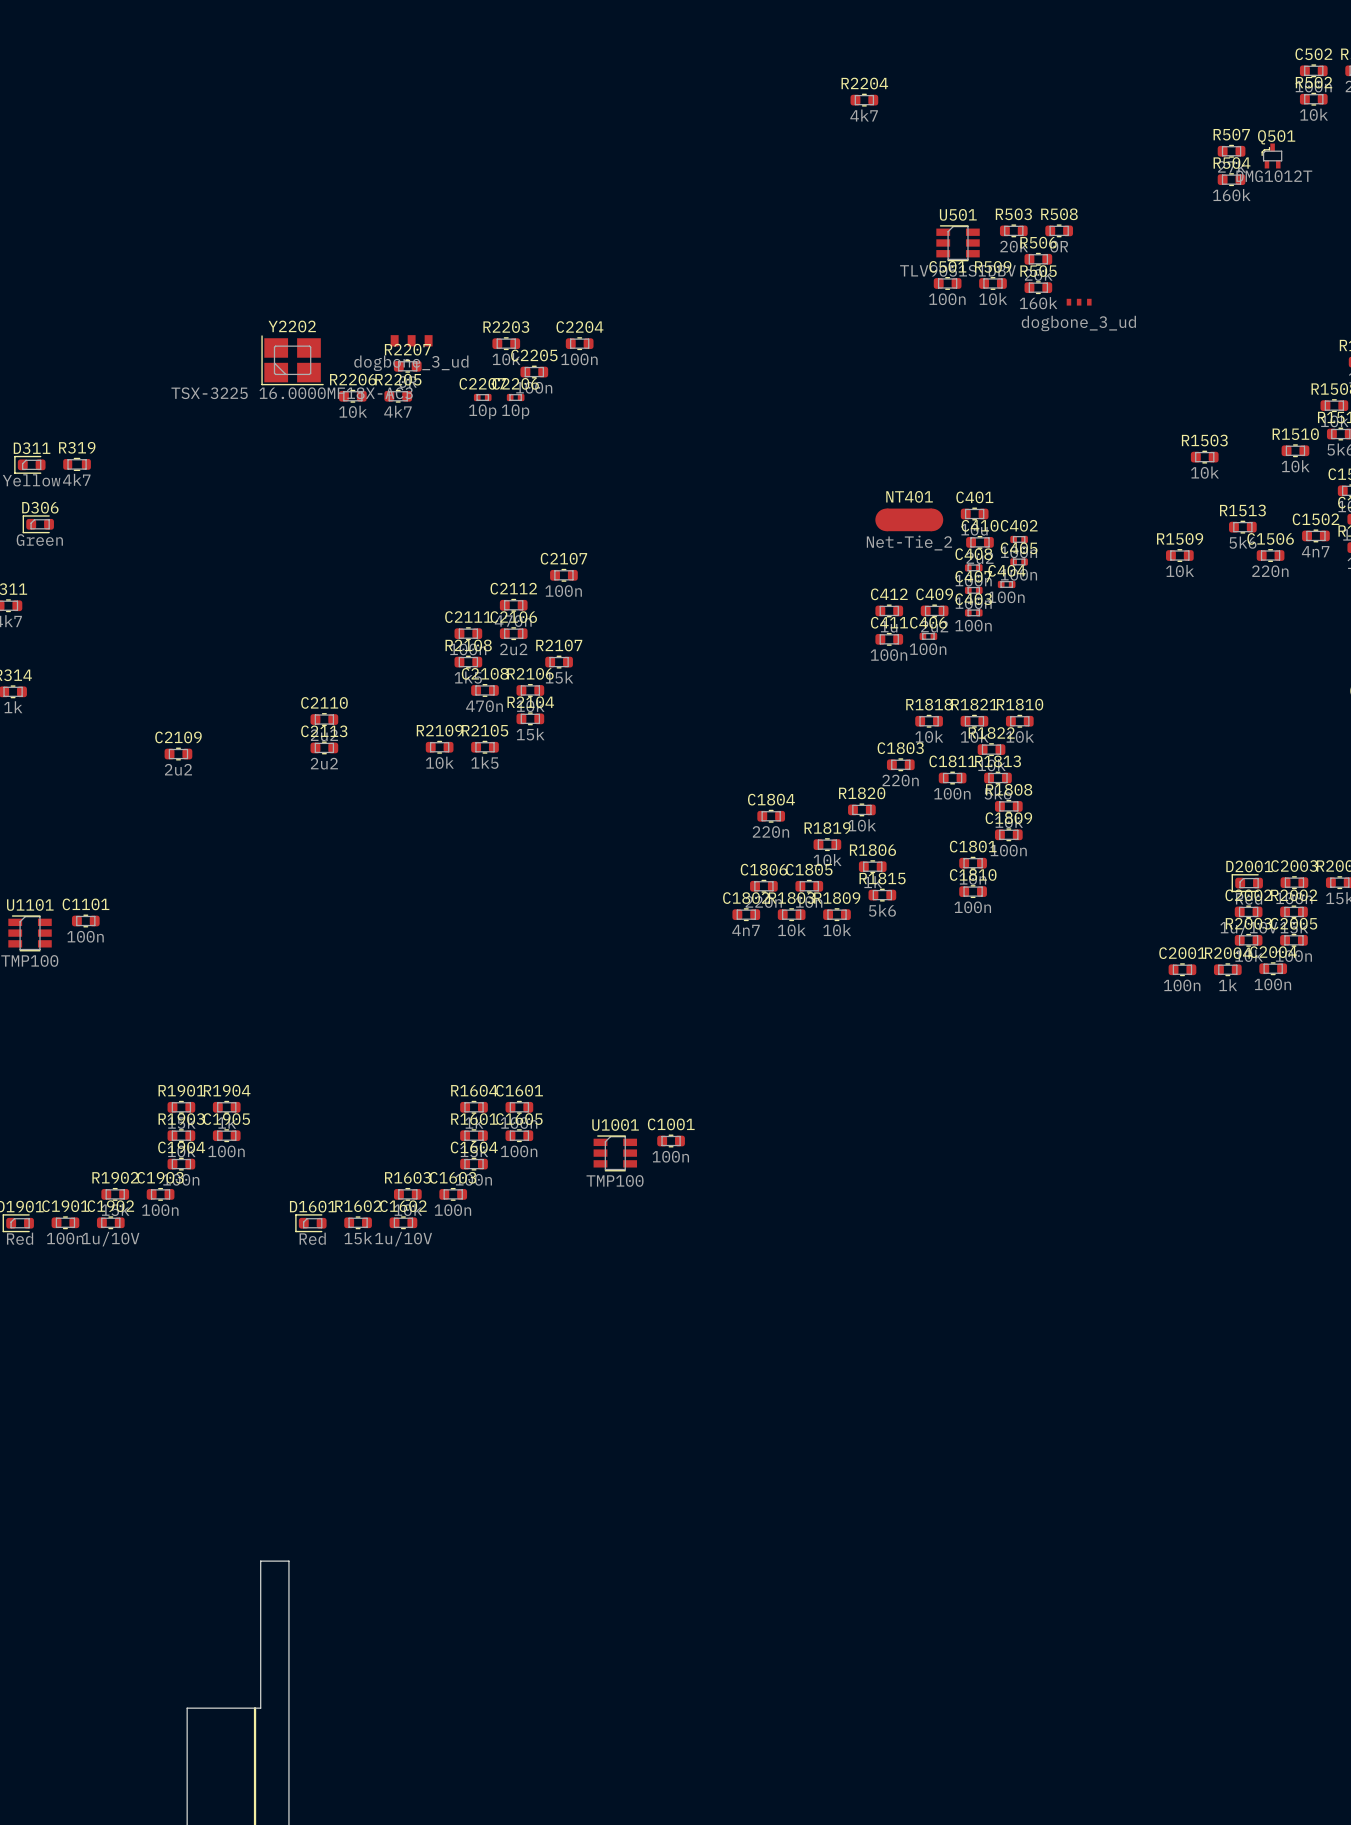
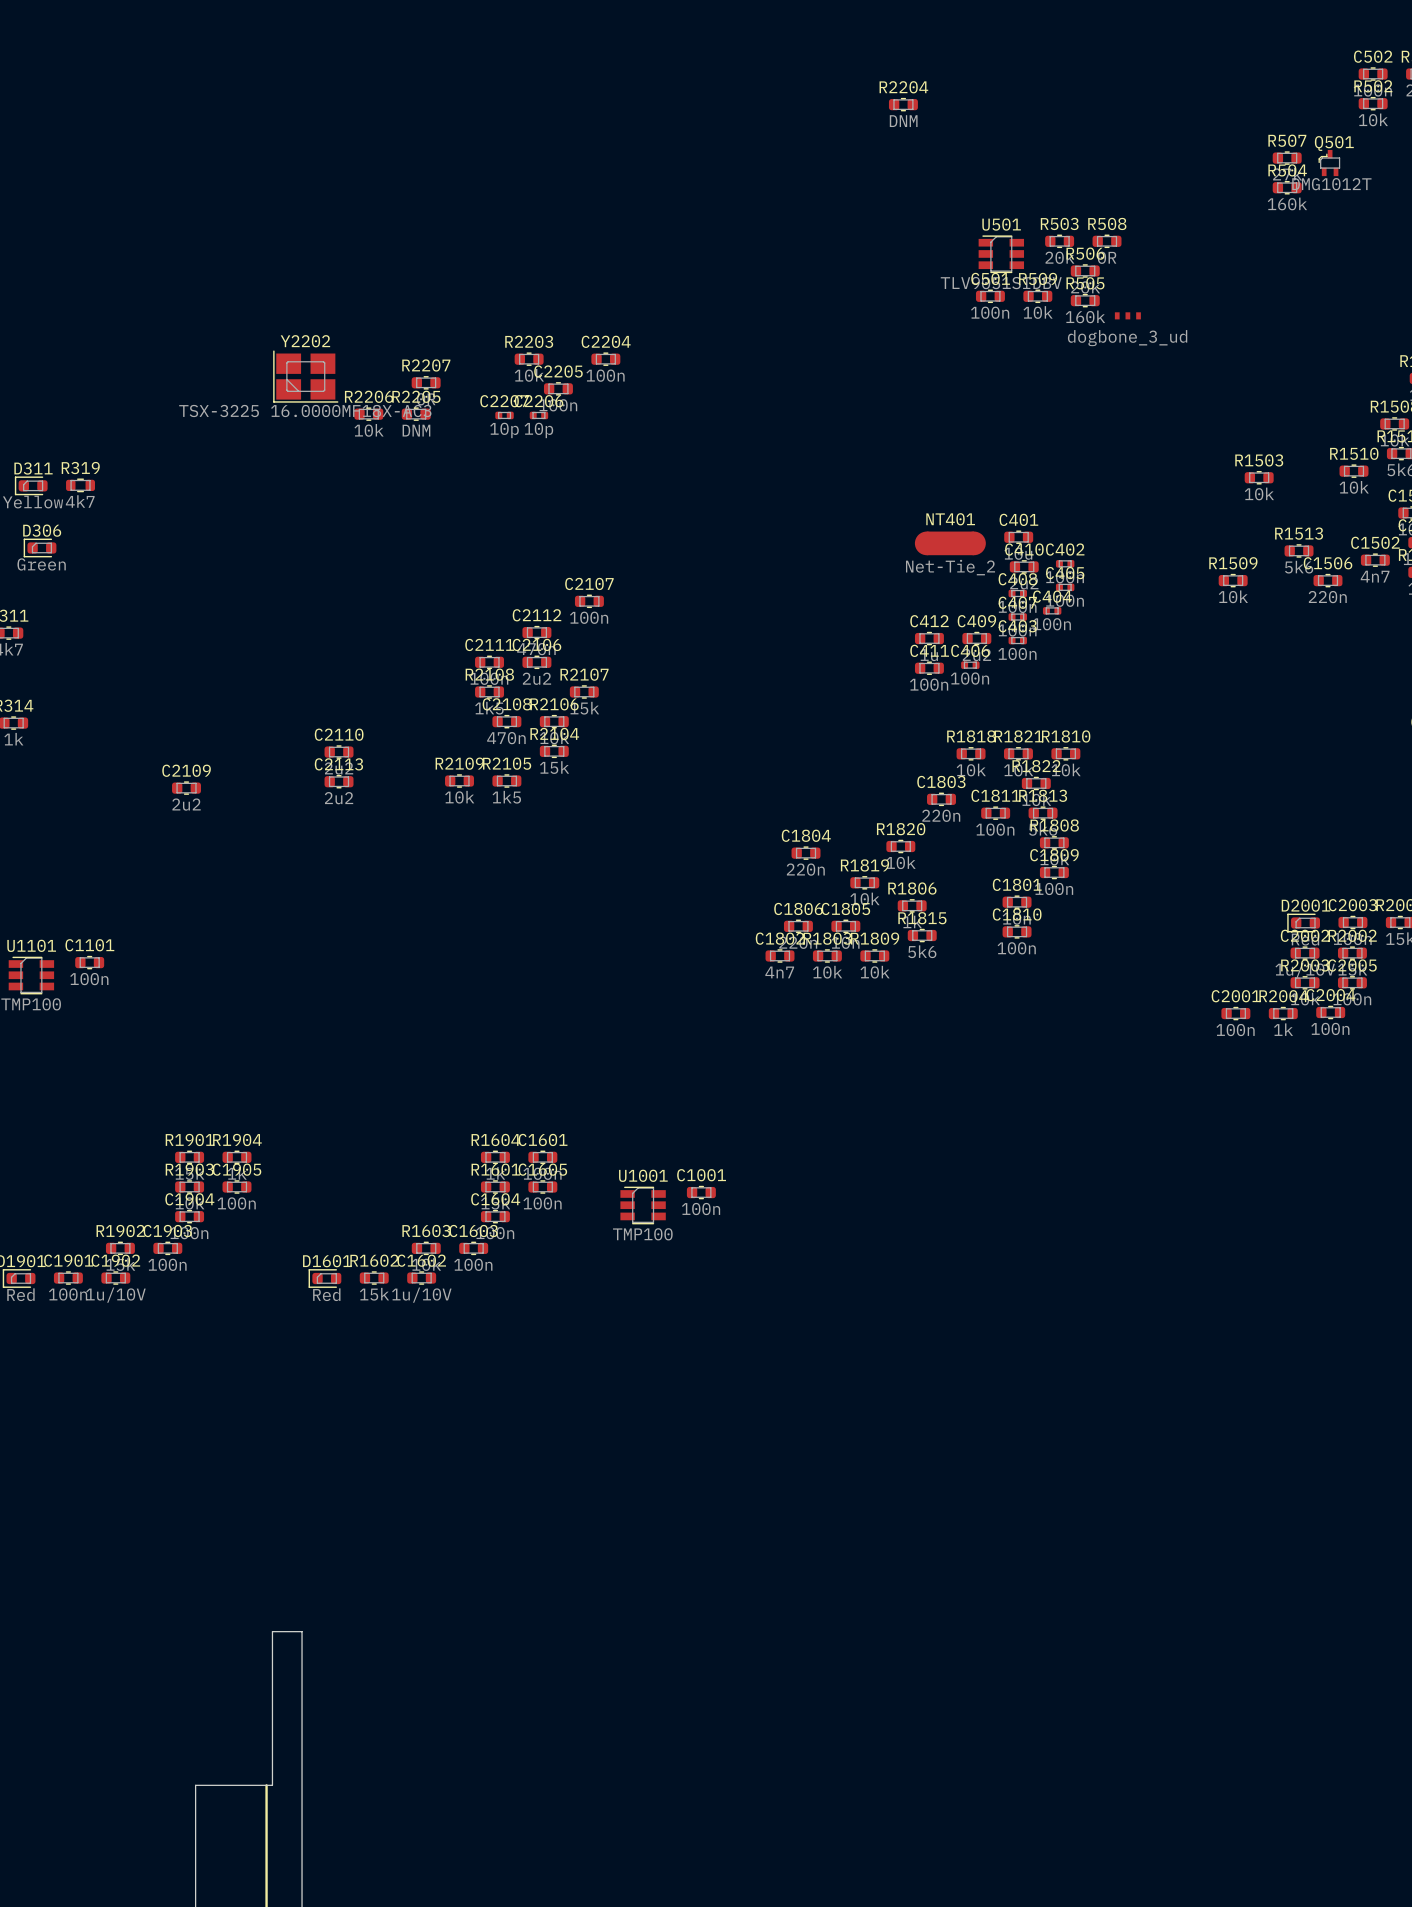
R2204 value: 4k7 (864, 115) -> DNM (903, 121)
part: dogbone_3_ud (411, 340) -> none
R2205 value: 4k7 (397, 411) -> DNM (416, 430)

